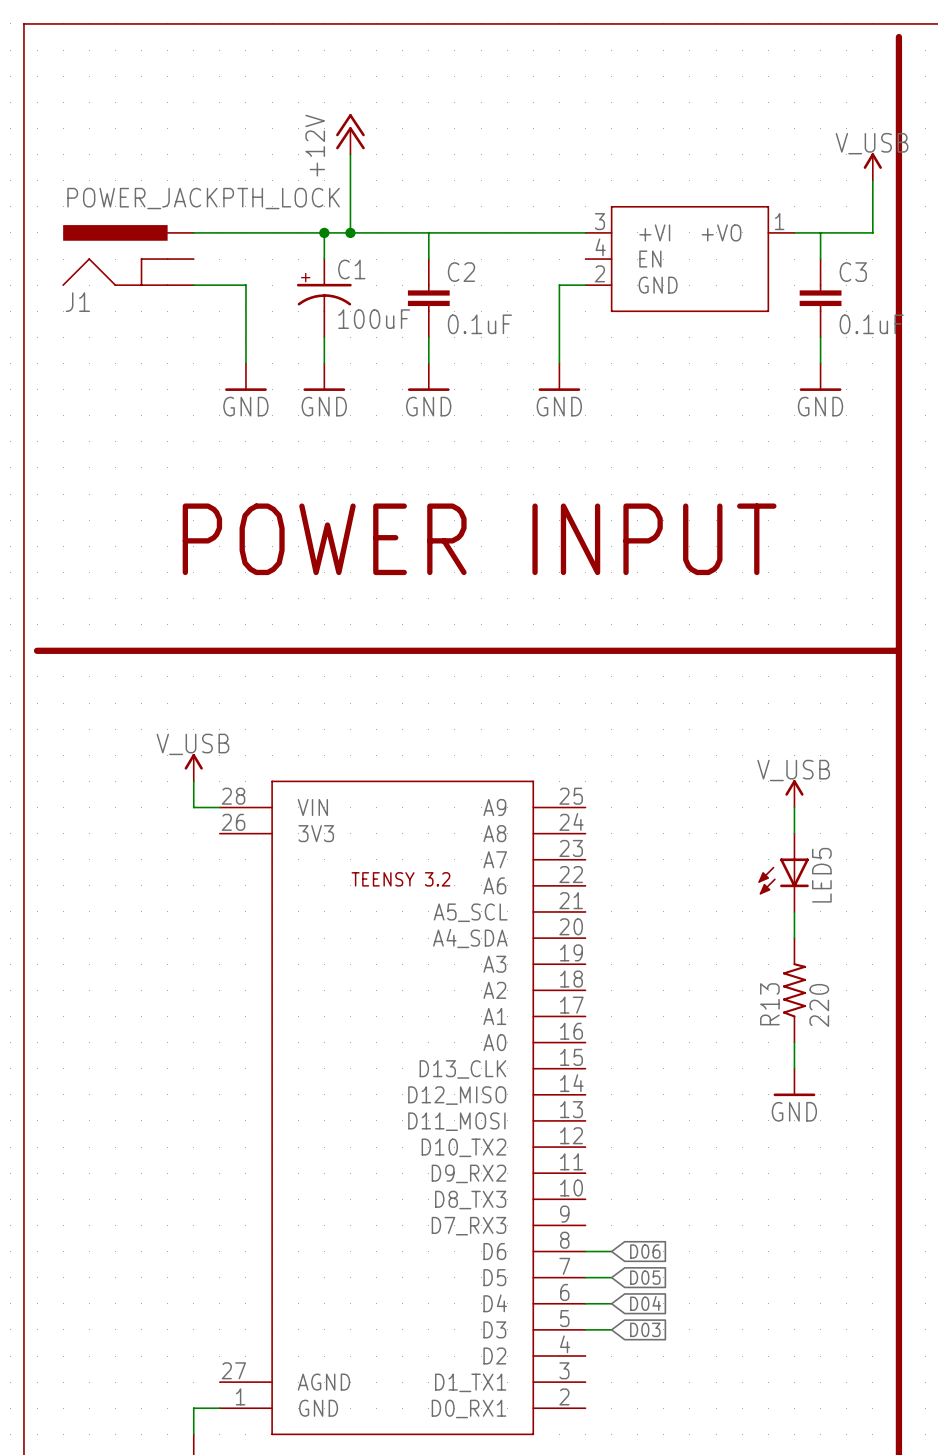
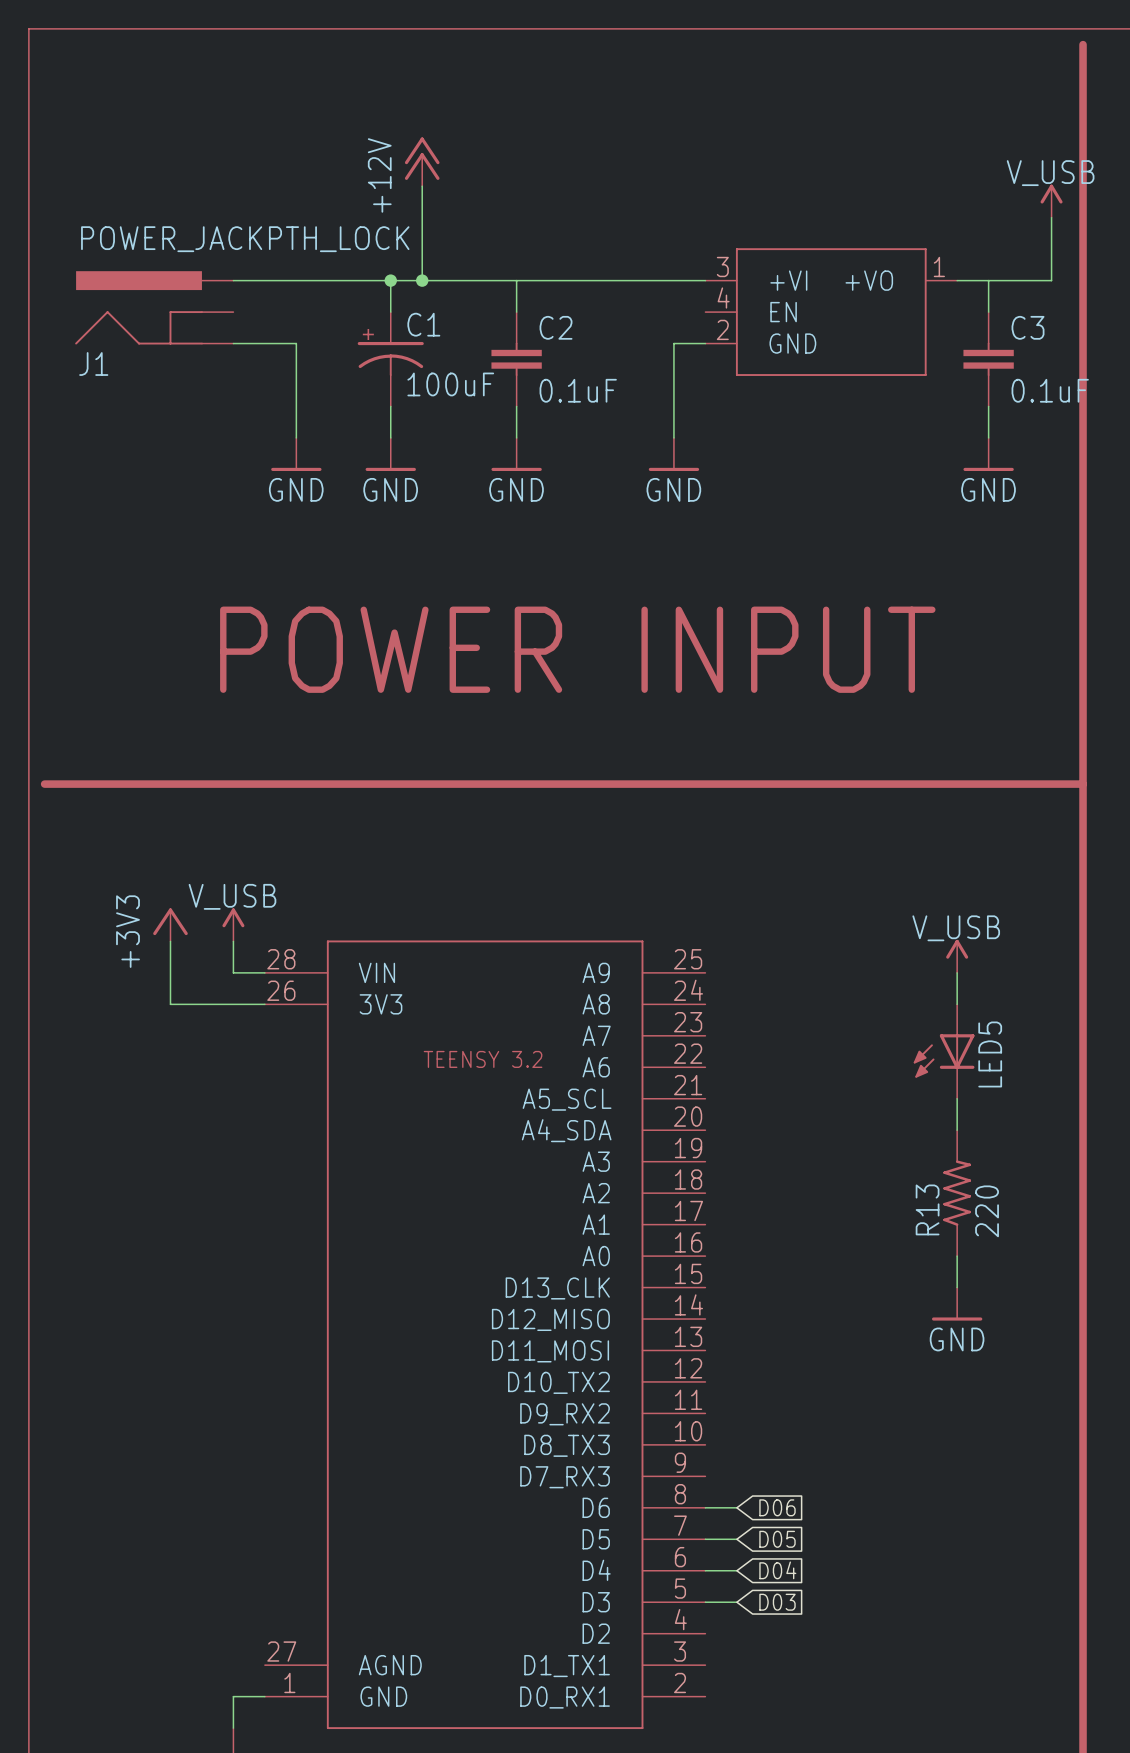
power symbol: none -> +3V3 (170, 924)
wire: none -> (170, 941) (170, 1004) (264, 1004)

